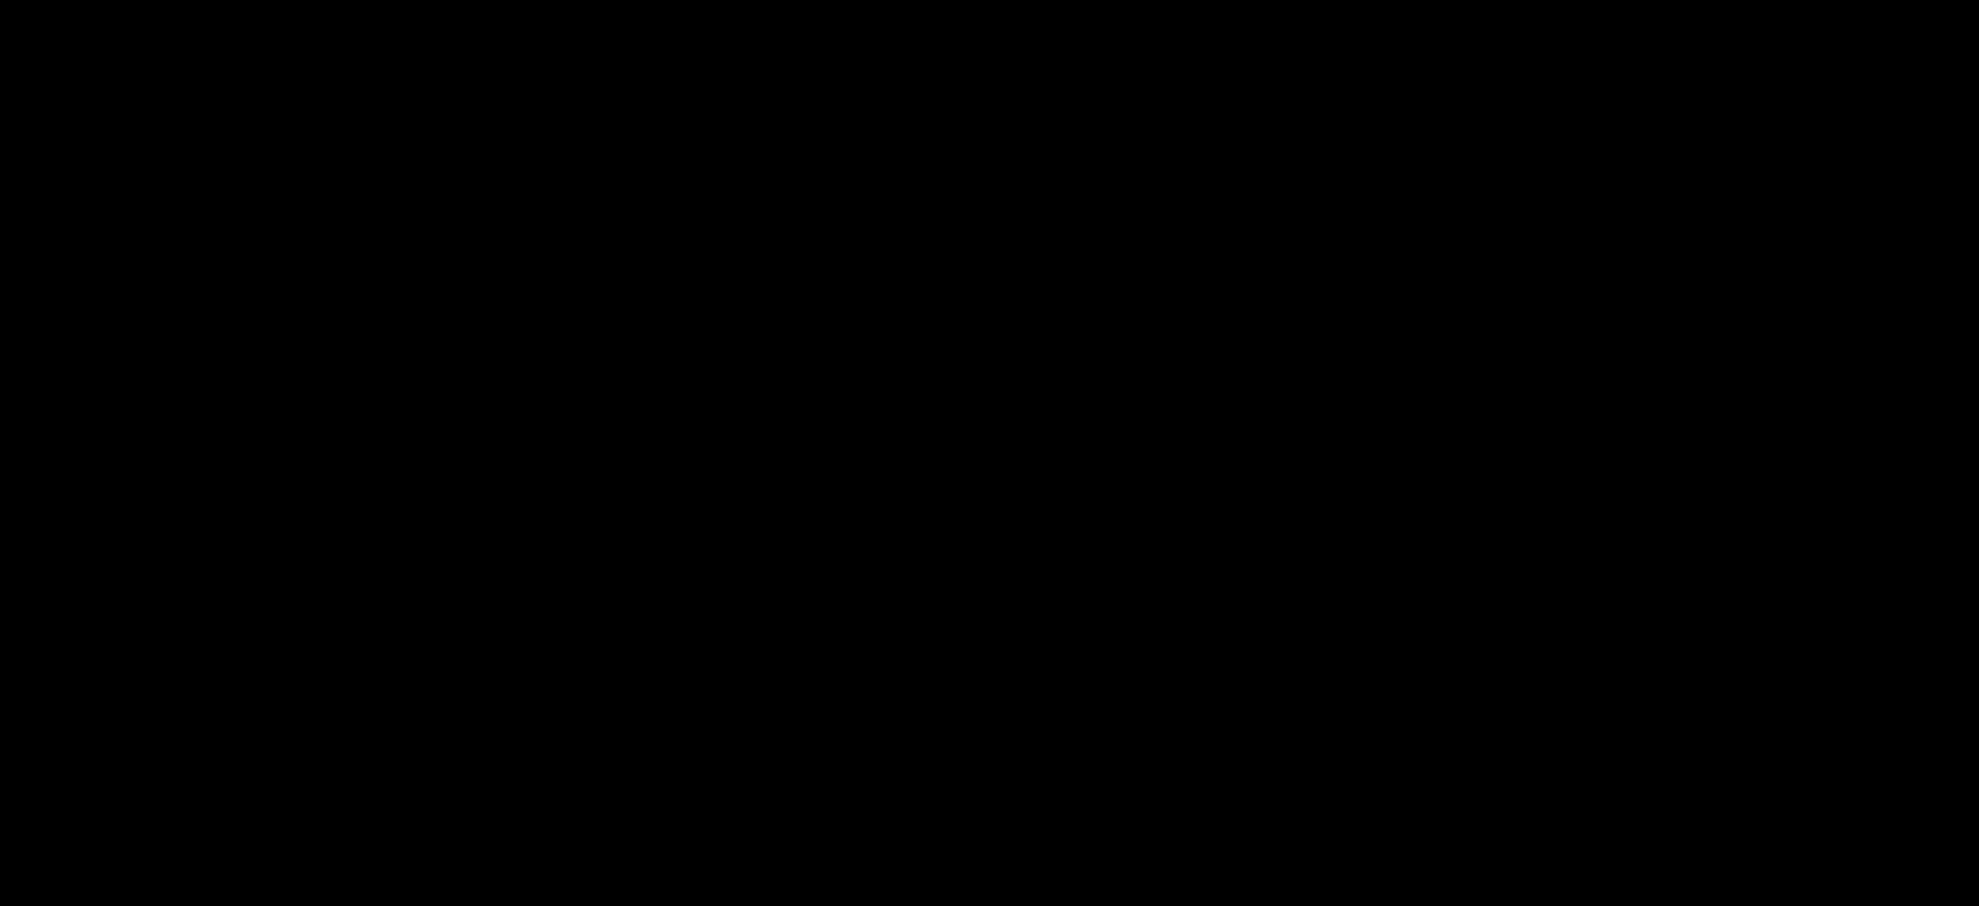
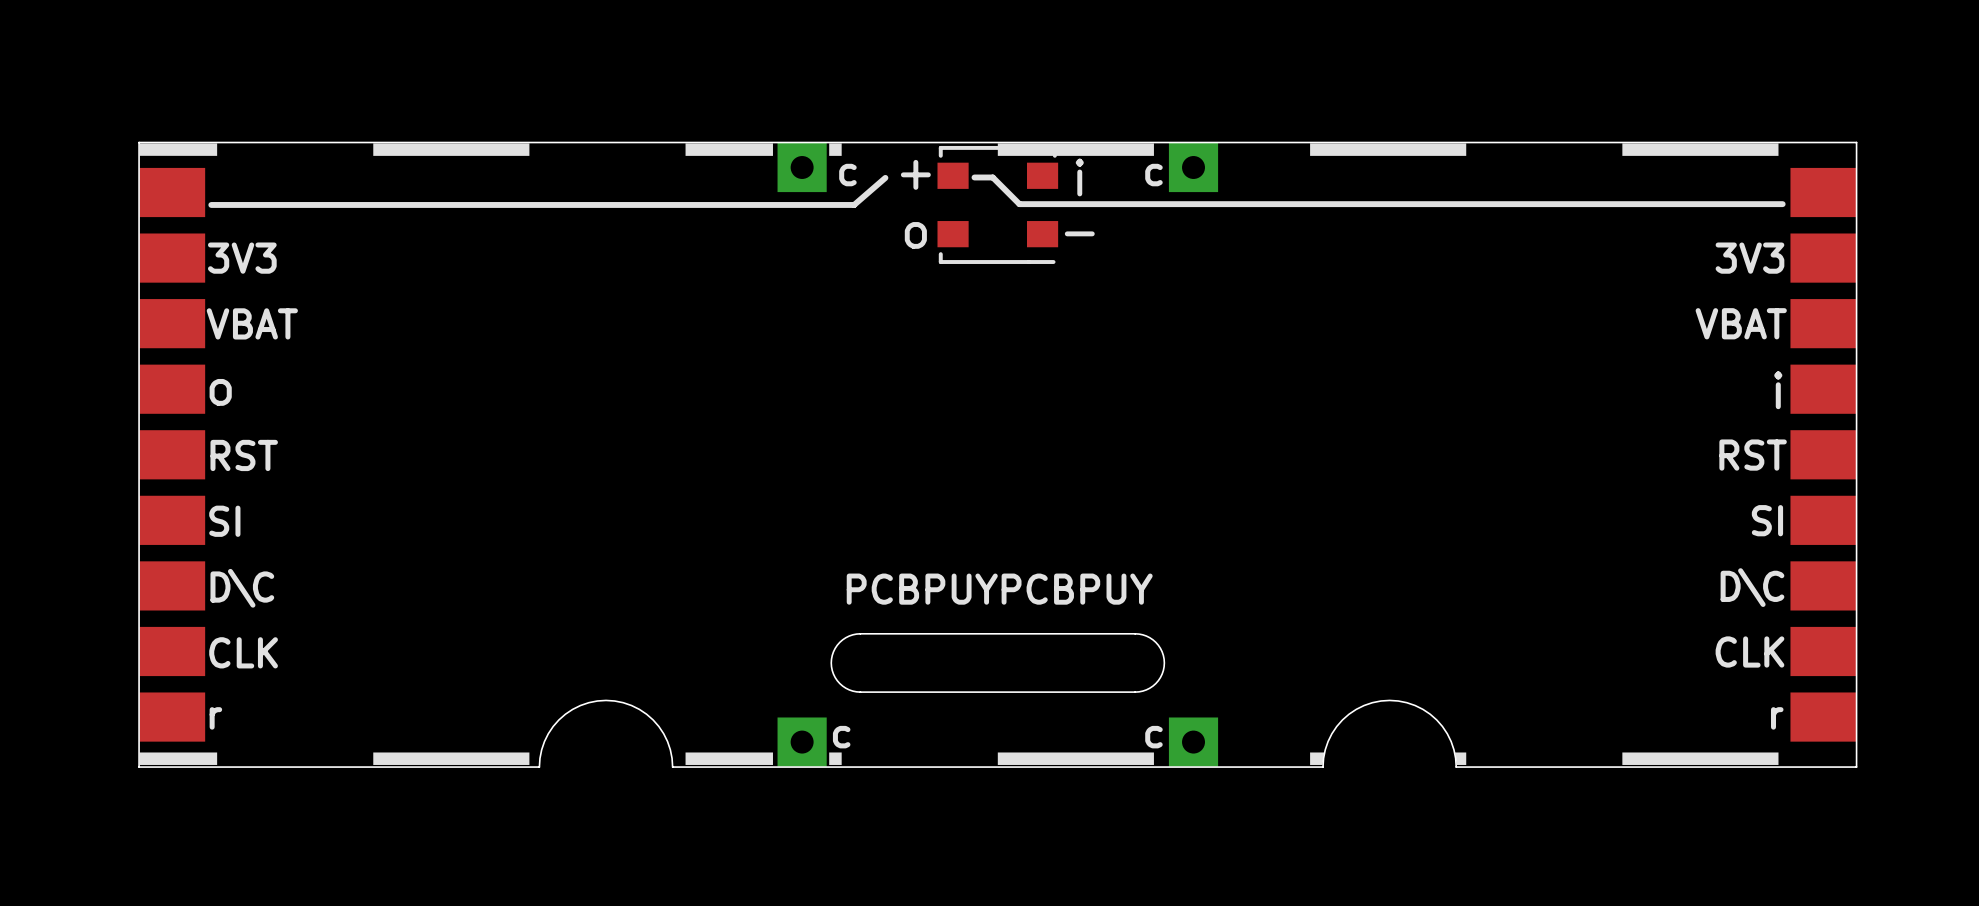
board edge: none -> (139, 142) (1856, 142) (1856, 767) (1456, 767) (1451, 741) (1436, 719) (1415, 705) (1389, 700) (1364, 705) (1342, 719) (1328, 741) (1322, 767) (672, 767) (667, 741) (653, 719) (631, 705) (606, 700) (580, 705) (558, 719) (544, 741) (539, 767) (139, 767) (139, 142)
drawing: none -> [139, 143, 218, 156]
drawing: none -> [373, 143, 530, 156]
drawing: none -> [685, 143, 773, 156]
drawing: none -> [829, 143, 842, 156]
drawing: none -> [997, 143, 1154, 156]
drawing: none -> [1310, 143, 1467, 156]
drawing: none -> [1622, 143, 1779, 156]
part: none -> (802, 167)
part: none -> (1193, 167)
text: none -> c (847, 175)
text: none -> c (1153, 175)
line: none -> (885, 177) (854, 204) (211, 204)
line: none -> (974, 177) (992, 177) (1019, 204) (1782, 204)
part: none -> (997, 204)
text: none -> 3V3 (242, 258)
text: none -> 3V3 (1749, 258)
text: none -> VBAT (252, 323)
text: none -> VBAT (1741, 323)
text: none -> i (1778, 390)
text: none -> o (220, 392)
part: none -> (172, 454)
part: none -> (1823, 454)
text: none -> RST (244, 455)
text: none -> RST (1753, 455)
text: none -> SI (1767, 520)
text: none -> SI (224, 521)
text: none -> D\C (1752, 587)
text: none -> D\C (242, 588)
text: none -> PCBPUYPCBPUY (999, 589)
board edge: none -> (860, 633) (1139, 634) (1149, 637) (1158, 645) (1163, 655) (1164, 666) (1155, 683) (1139, 691) (856, 691) (845, 688) (837, 680) (832, 670) (831, 659) (835, 648) (842, 639) (860, 633)
text: none -> CLK (243, 652)
text: none -> CLK (1749, 651)
text: none -> r (215, 718)
text: none -> r (1777, 718)
text: none -> c (841, 737)
text: none -> c (1153, 737)
part: none -> (802, 742)
part: none -> (1193, 742)
drawing: none -> [139, 752, 218, 765]
drawing: none -> [373, 752, 530, 765]
drawing: none -> [685, 752, 773, 765]
drawing: none -> [829, 752, 842, 765]
drawing: none -> [997, 752, 1154, 765]
drawing: none -> [1310, 752, 1325, 765]
drawing: none -> [1454, 752, 1467, 765]
drawing: none -> [1622, 752, 1779, 765]

